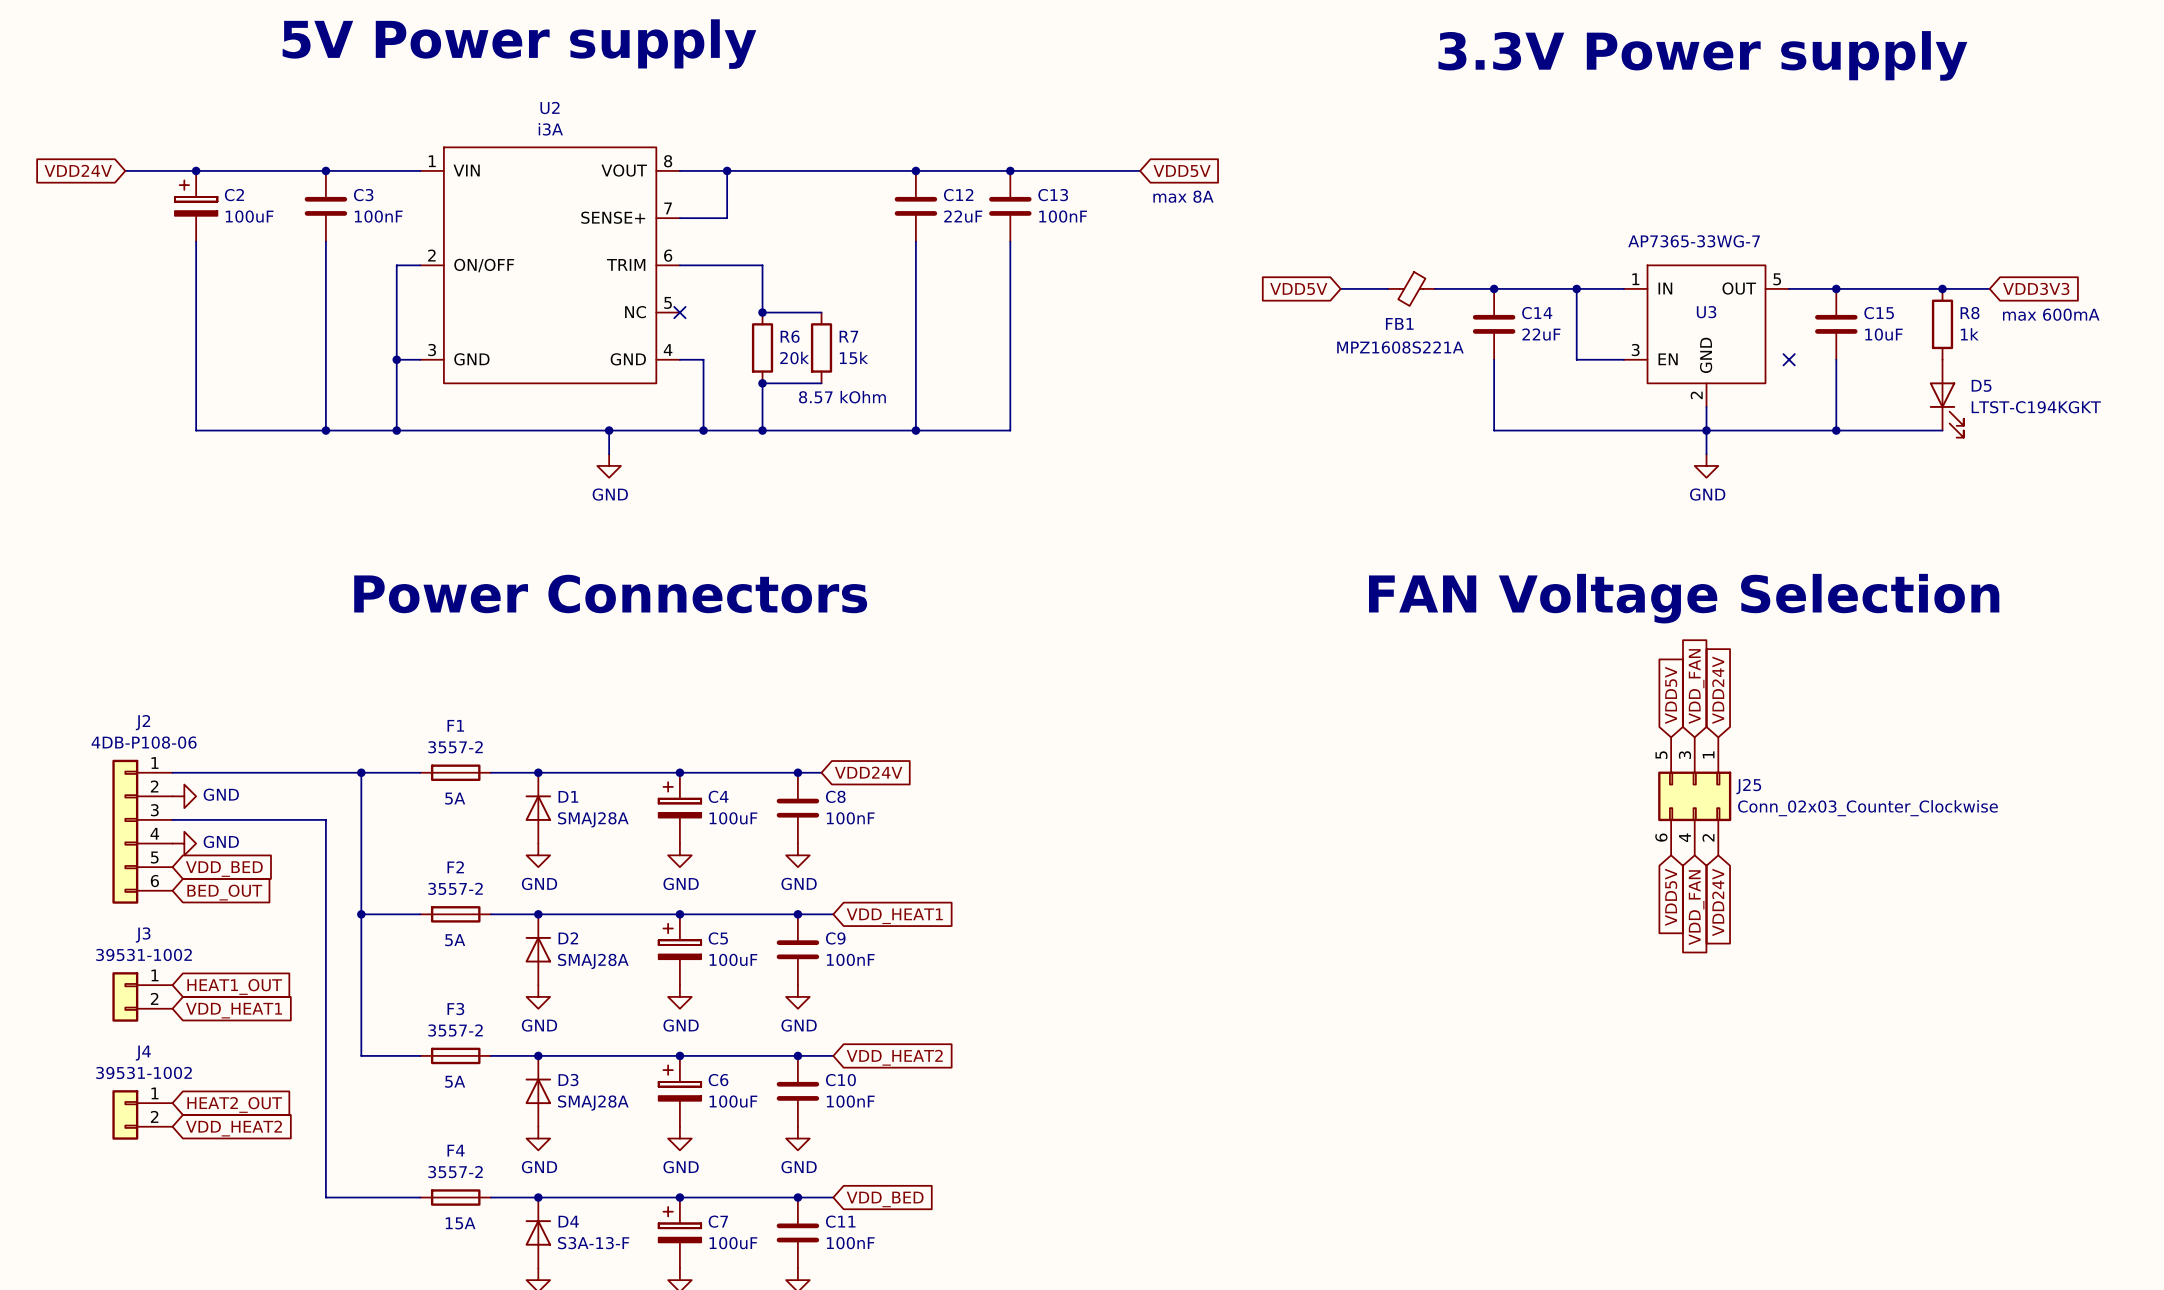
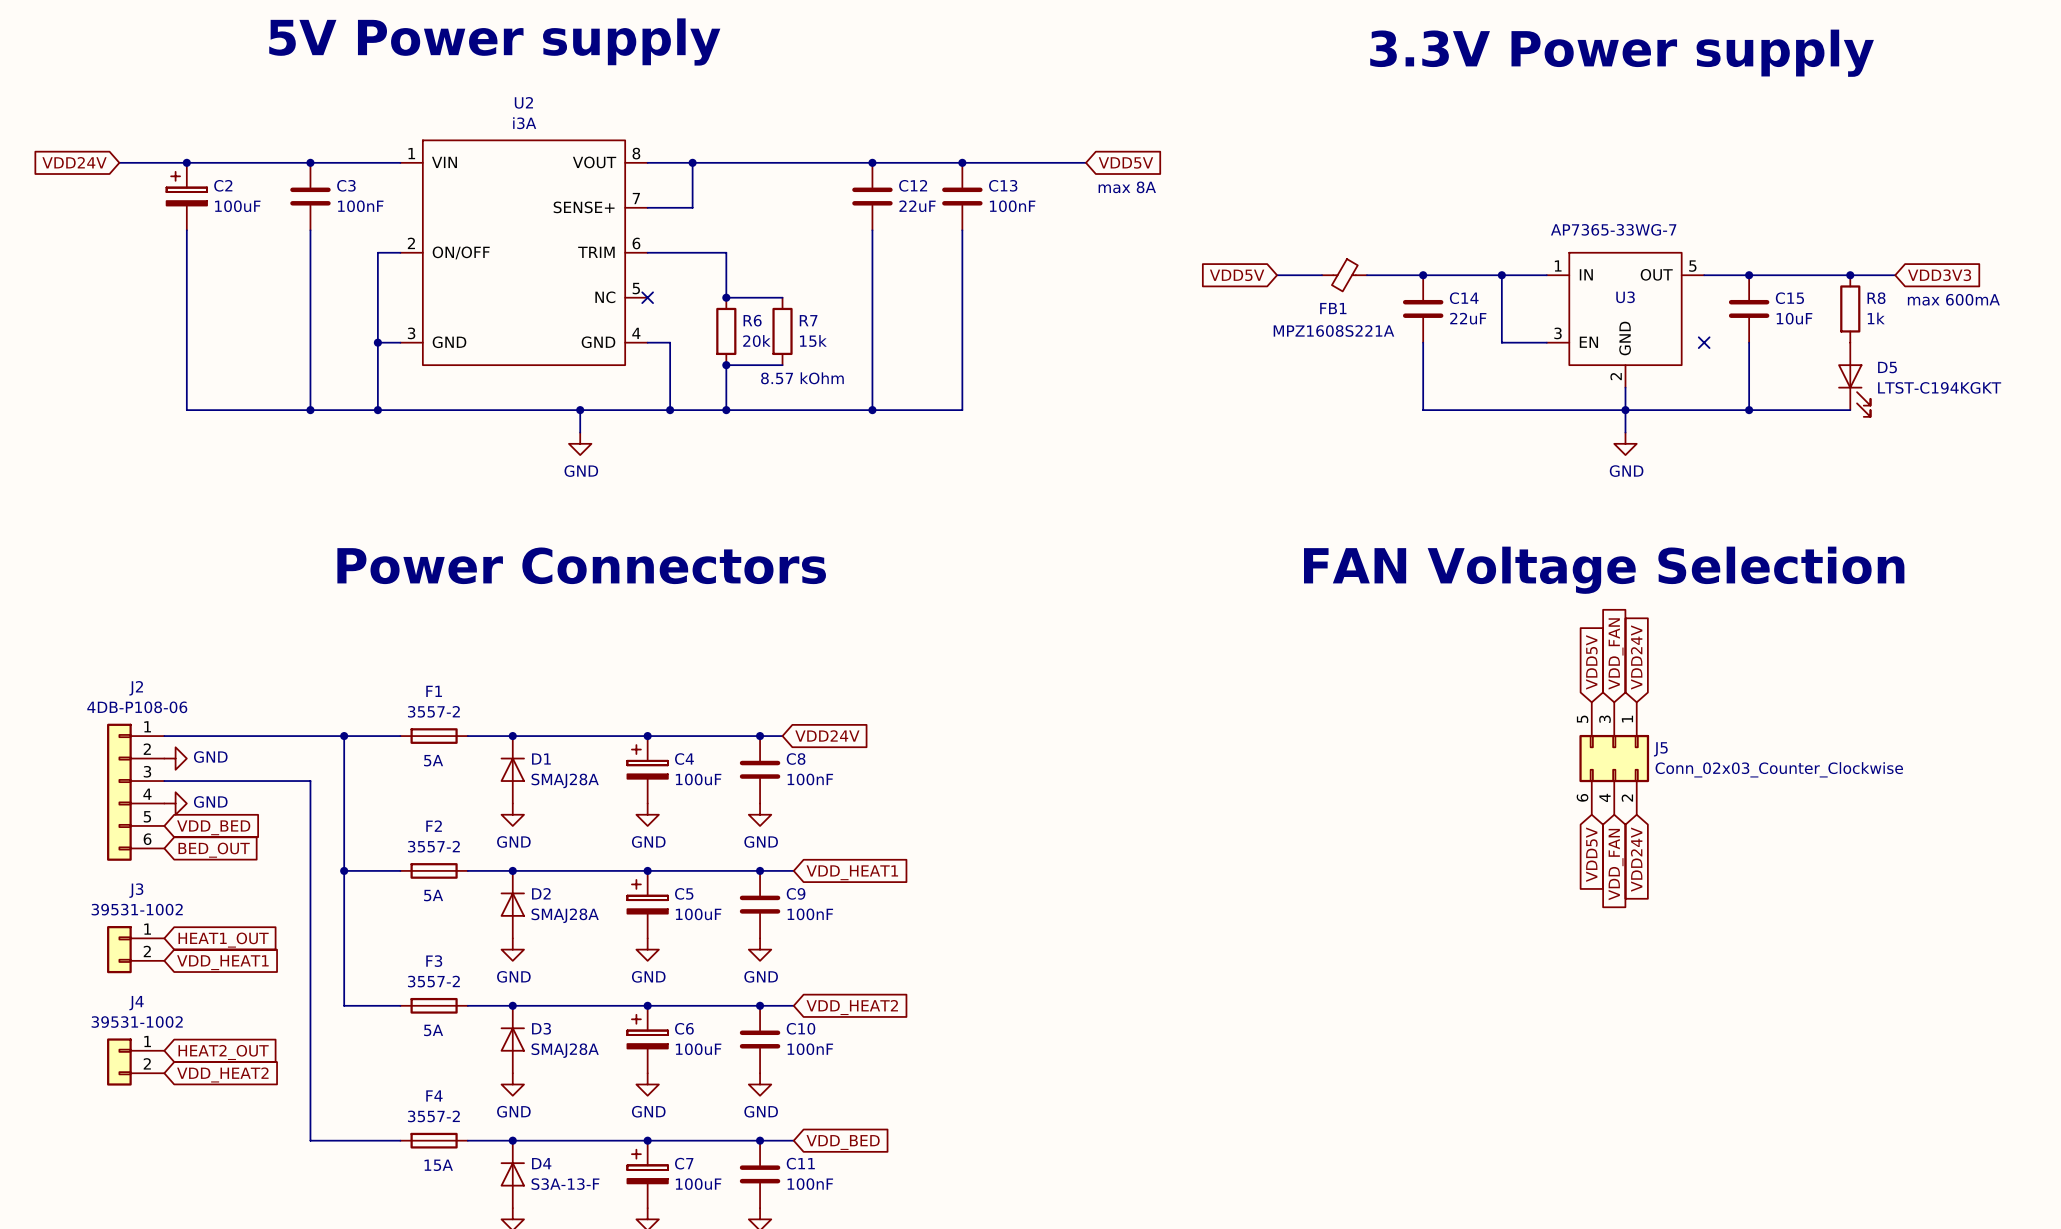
J25 name: J25 (1748, 786) -> J5 (1660, 749)

